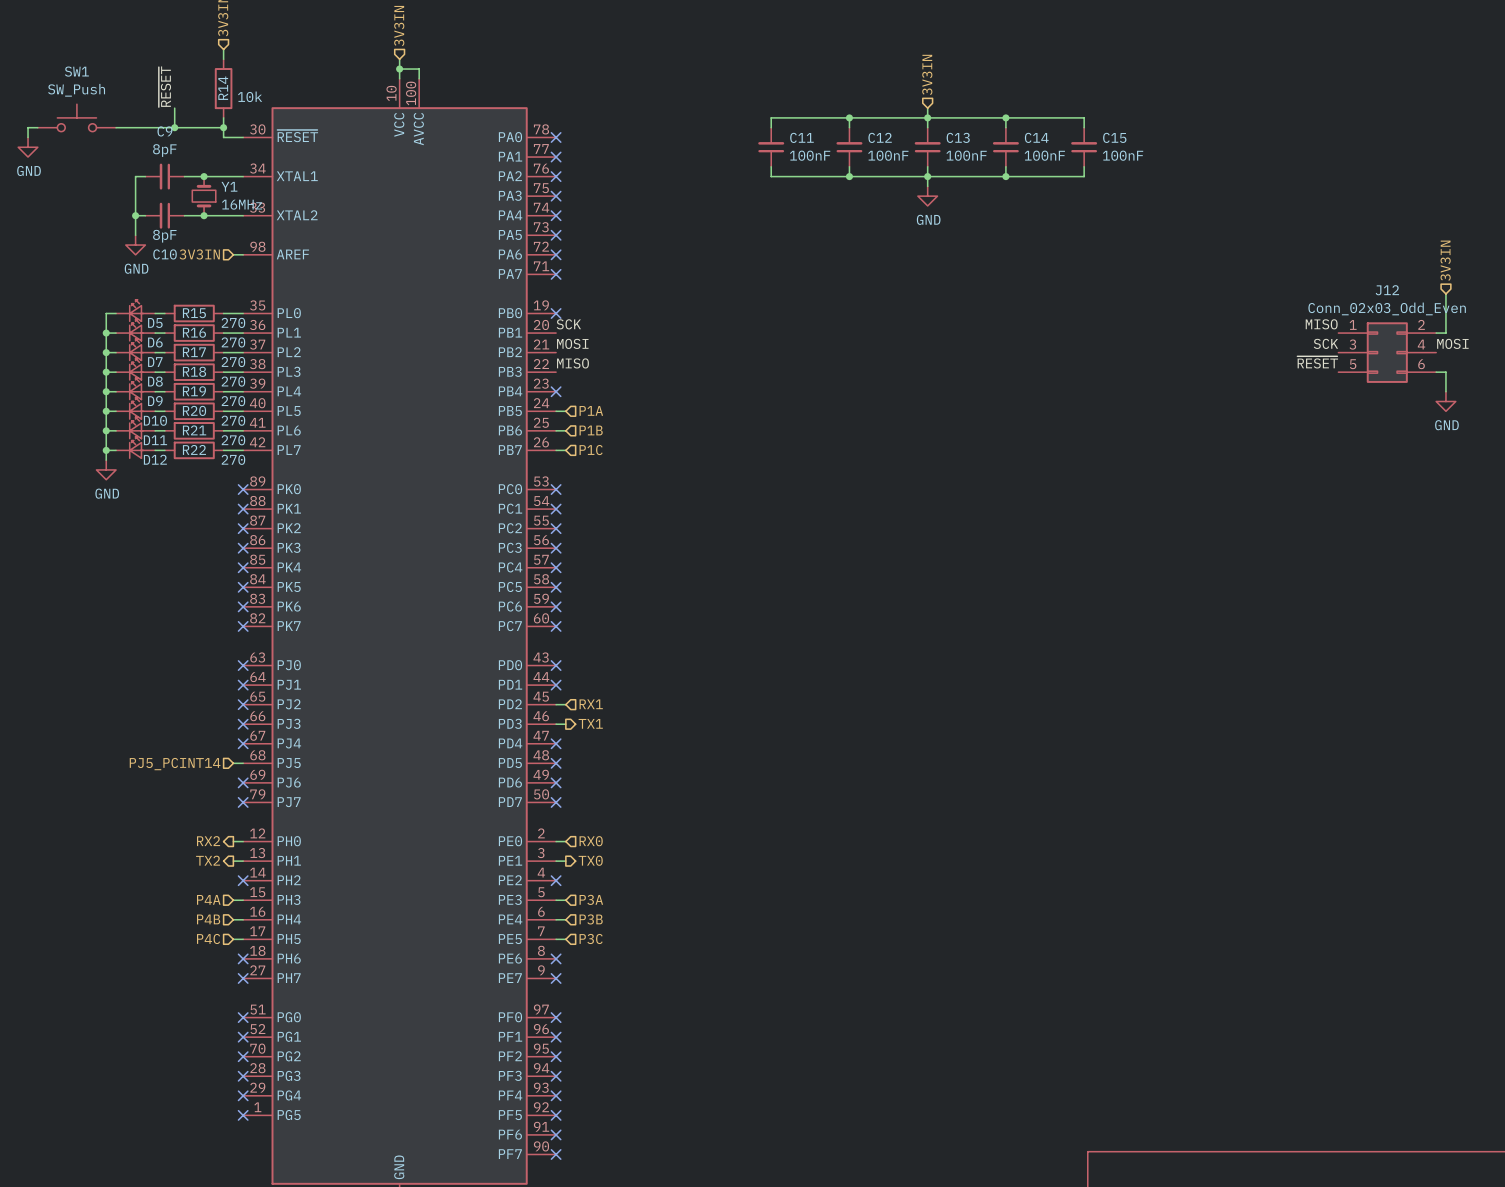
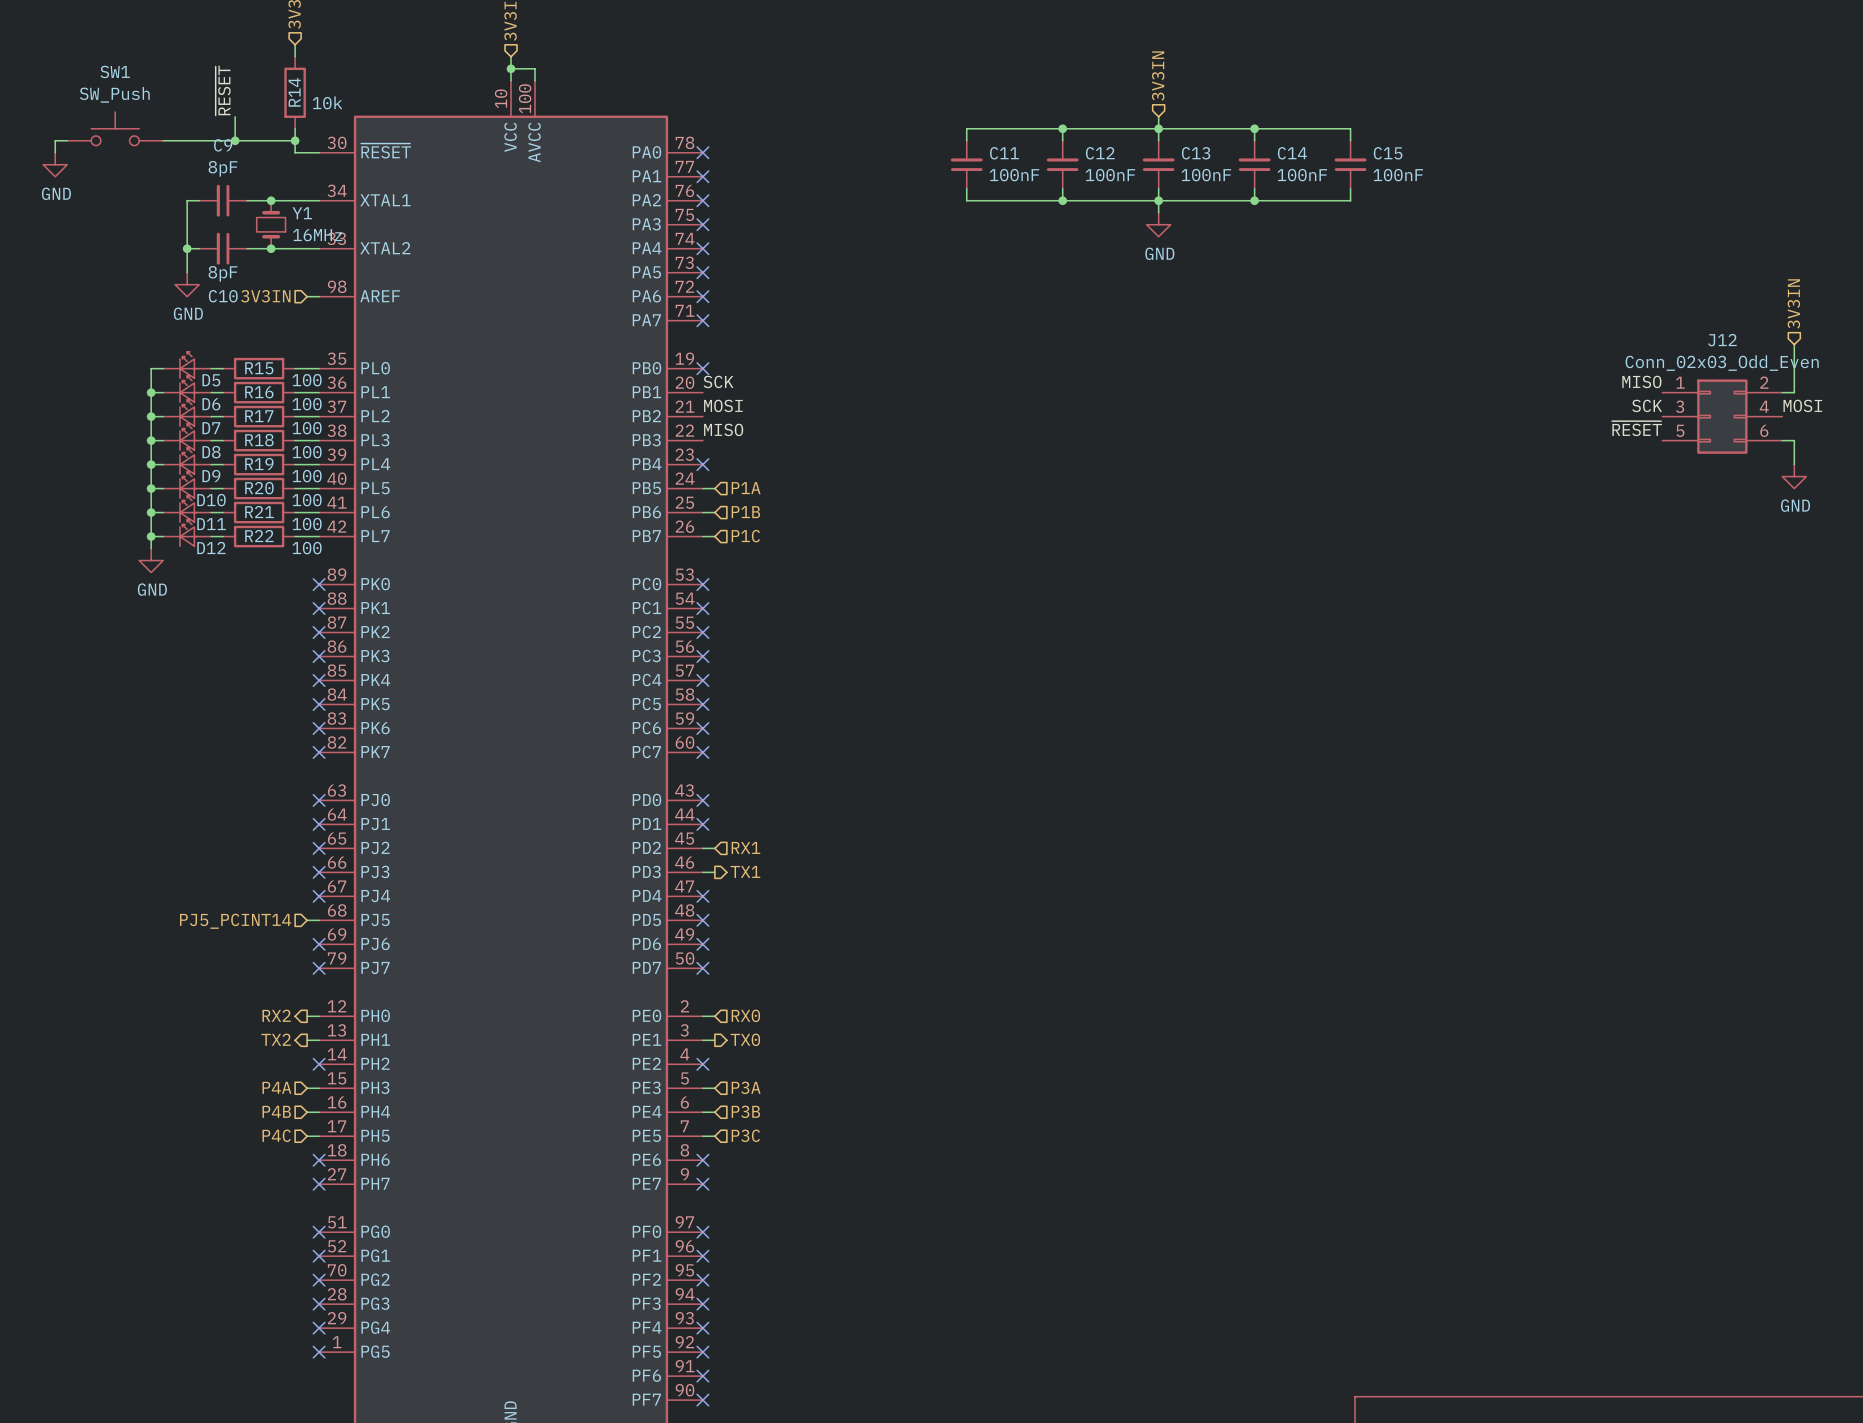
R15 value: 270 (233, 322) -> 100 (307, 380)
R16 value: 270 (233, 342) -> 100 (307, 404)
R17 value: 270 (233, 362) -> 100 (307, 428)
R18 value: 270 (233, 381) -> 100 (307, 452)
R19 value: 270 (233, 401) -> 100 (307, 476)
R20 value: 270 (233, 420) -> 100 (307, 500)
R21 value: 270 (233, 440) -> 100 (307, 524)
R22 value: 270 (233, 459) -> 100 (307, 548)

